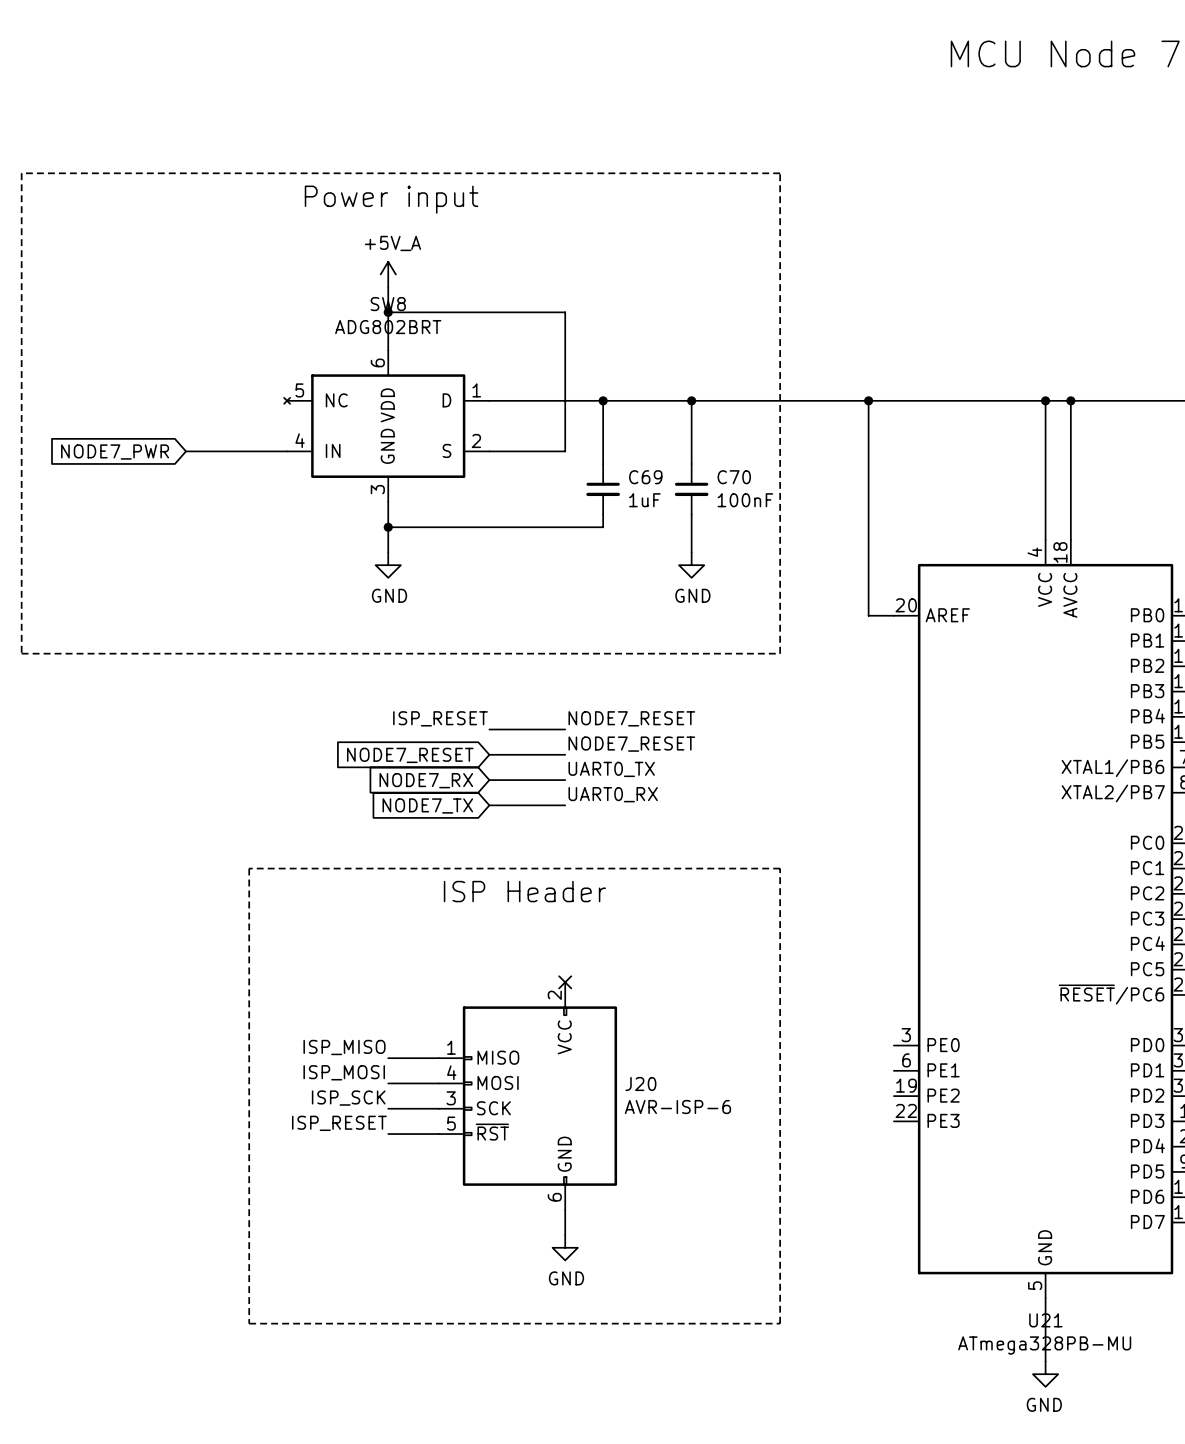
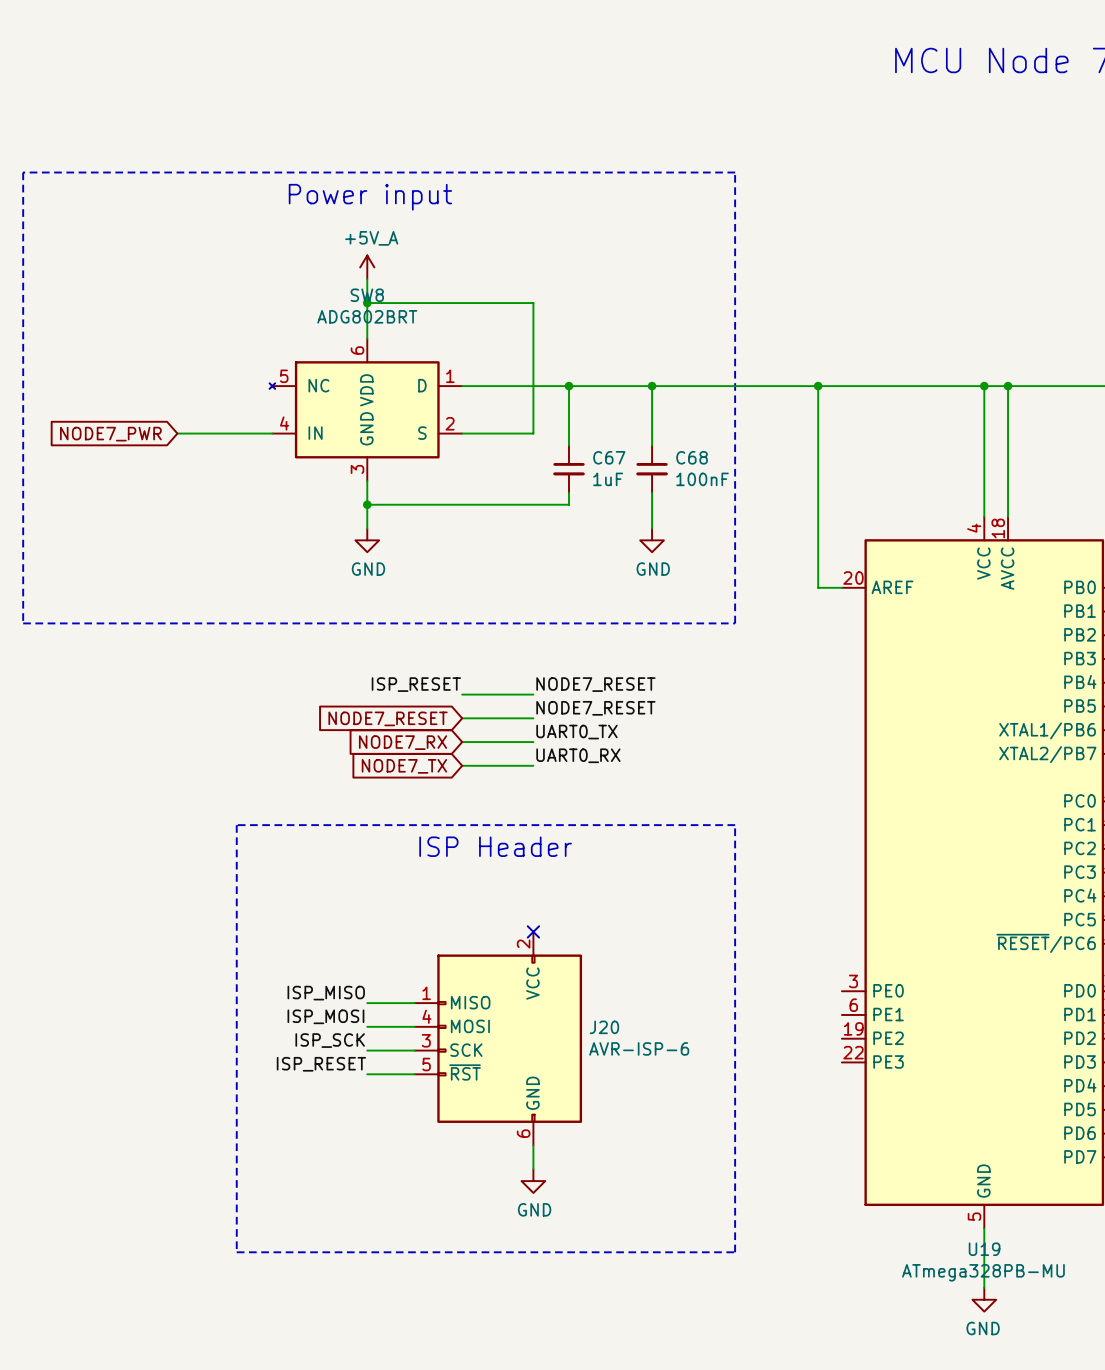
C69 name: C69 (645, 477) -> C67 (609, 457)
C70 name: C70 (734, 477) -> C68 (692, 457)
U21 name: U21 (1045, 1320) -> U19 (984, 1249)

